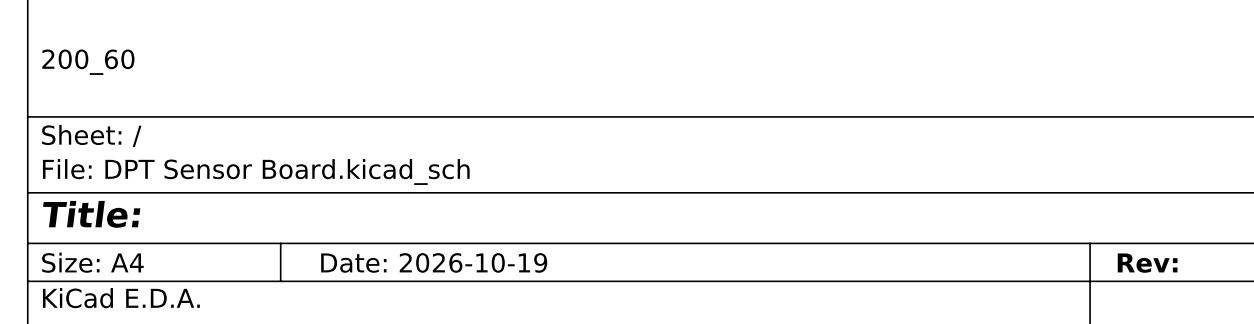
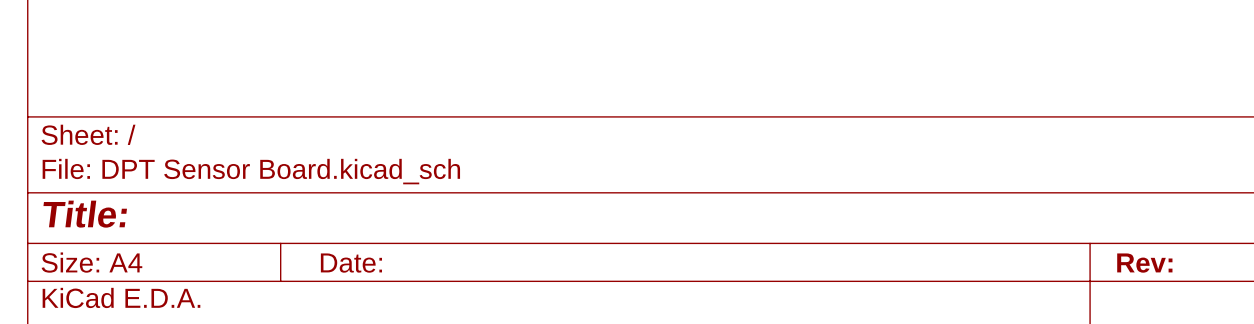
title block: 200_60 (88, 62) -> none
title block: Date: 2026-10-19 (434, 262) -> Date: (351, 263)

